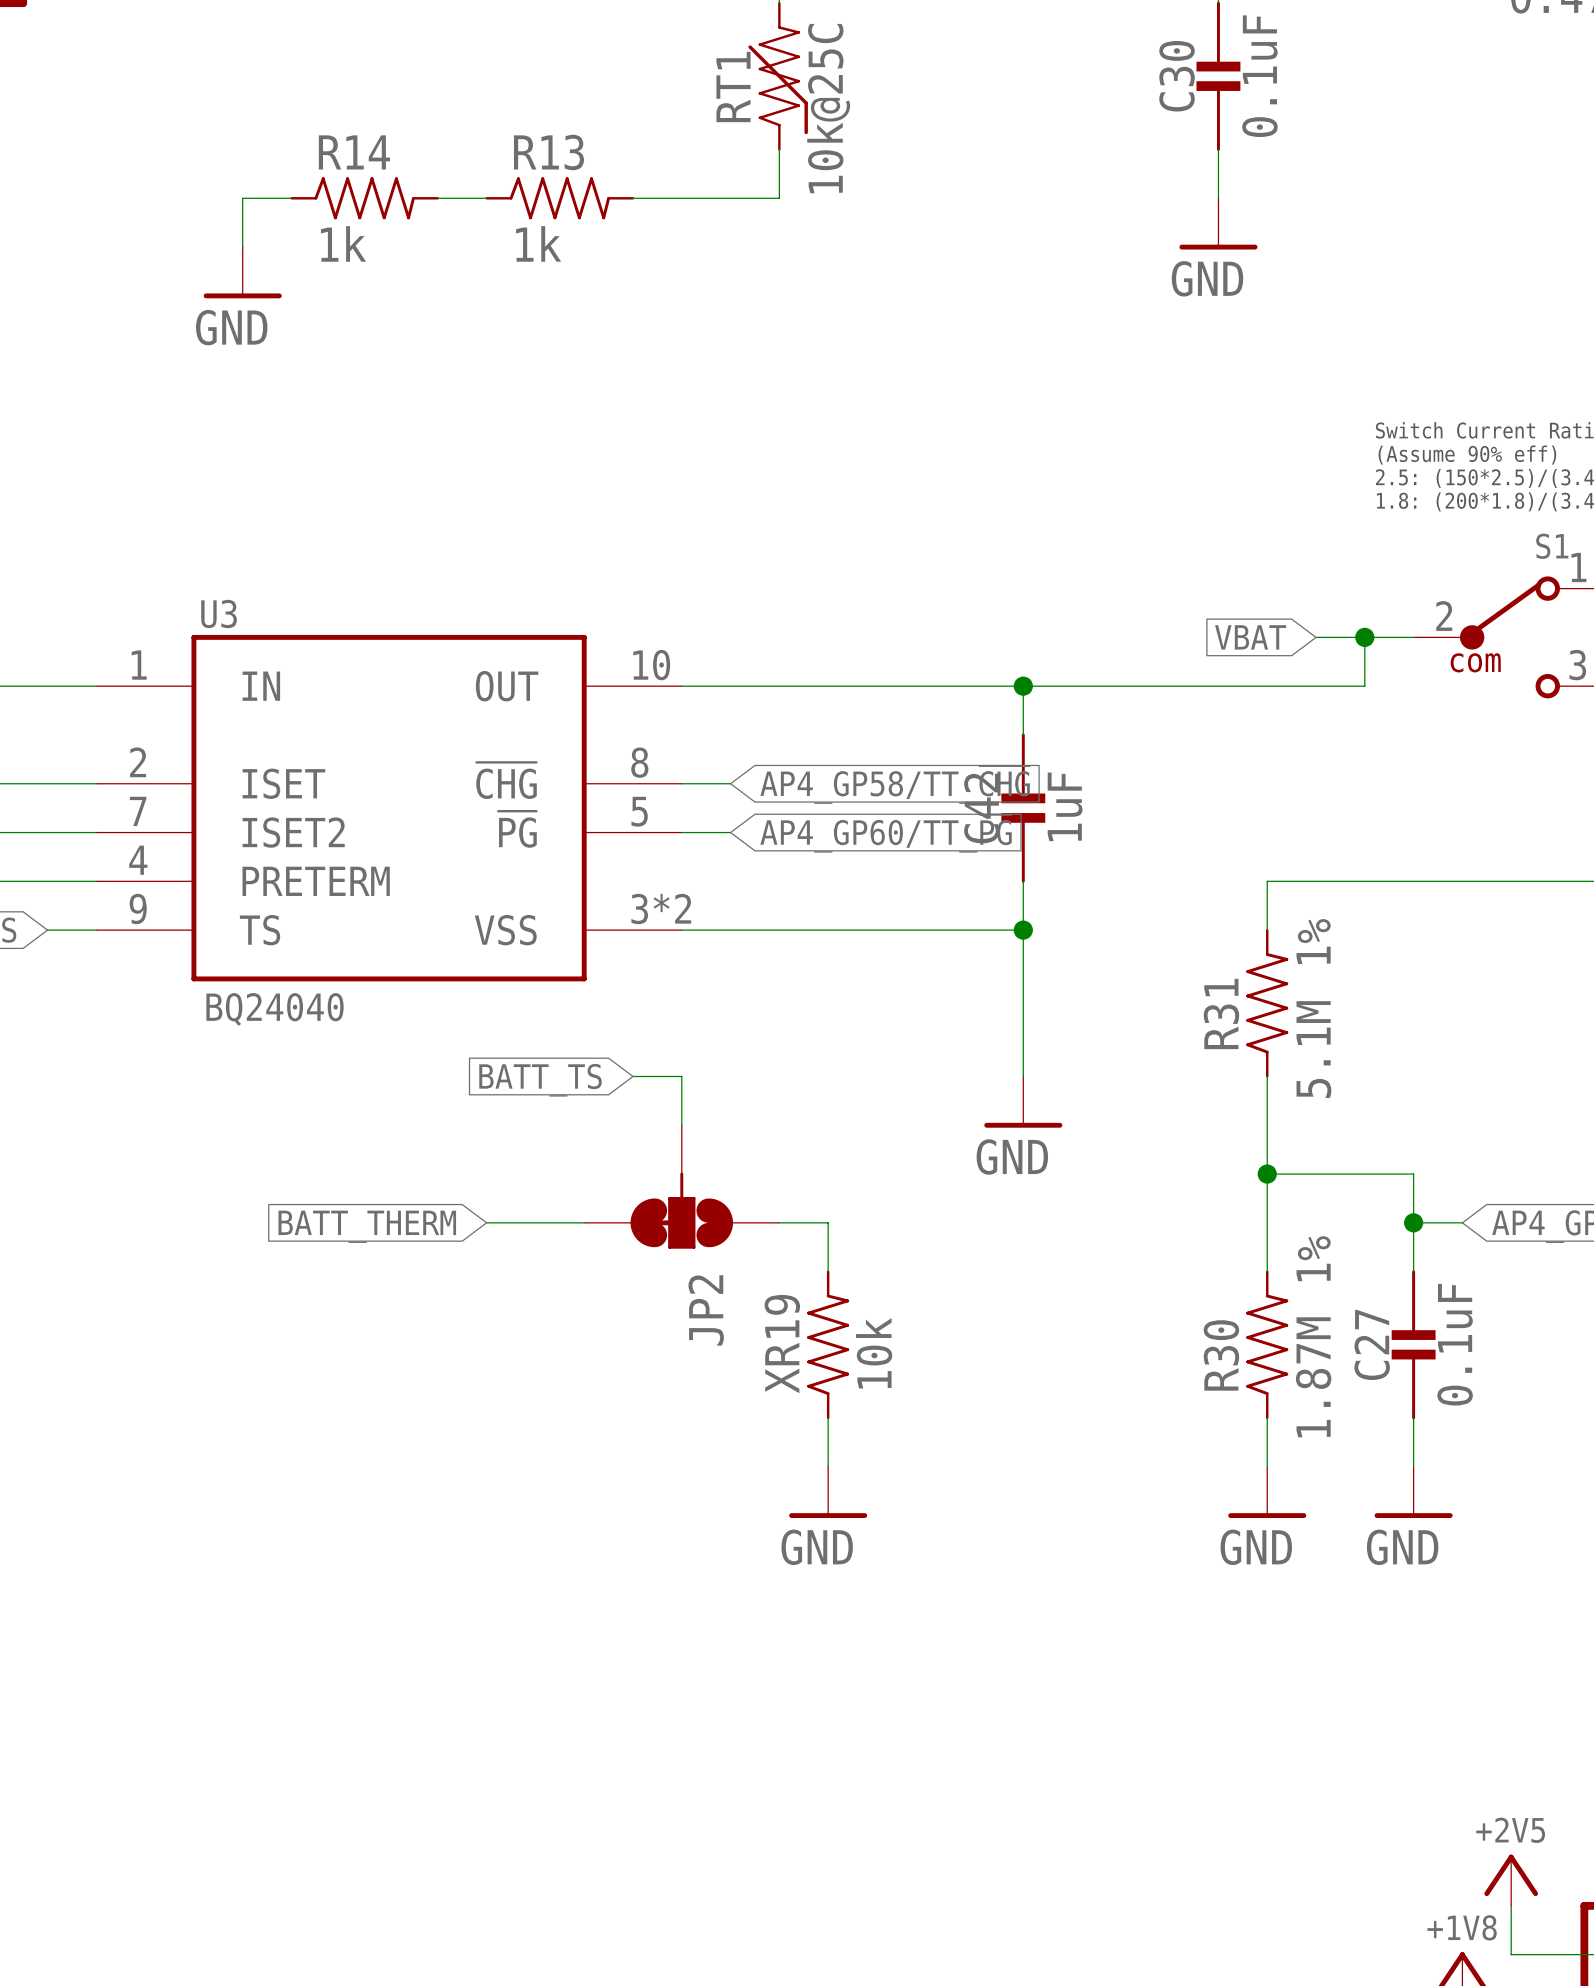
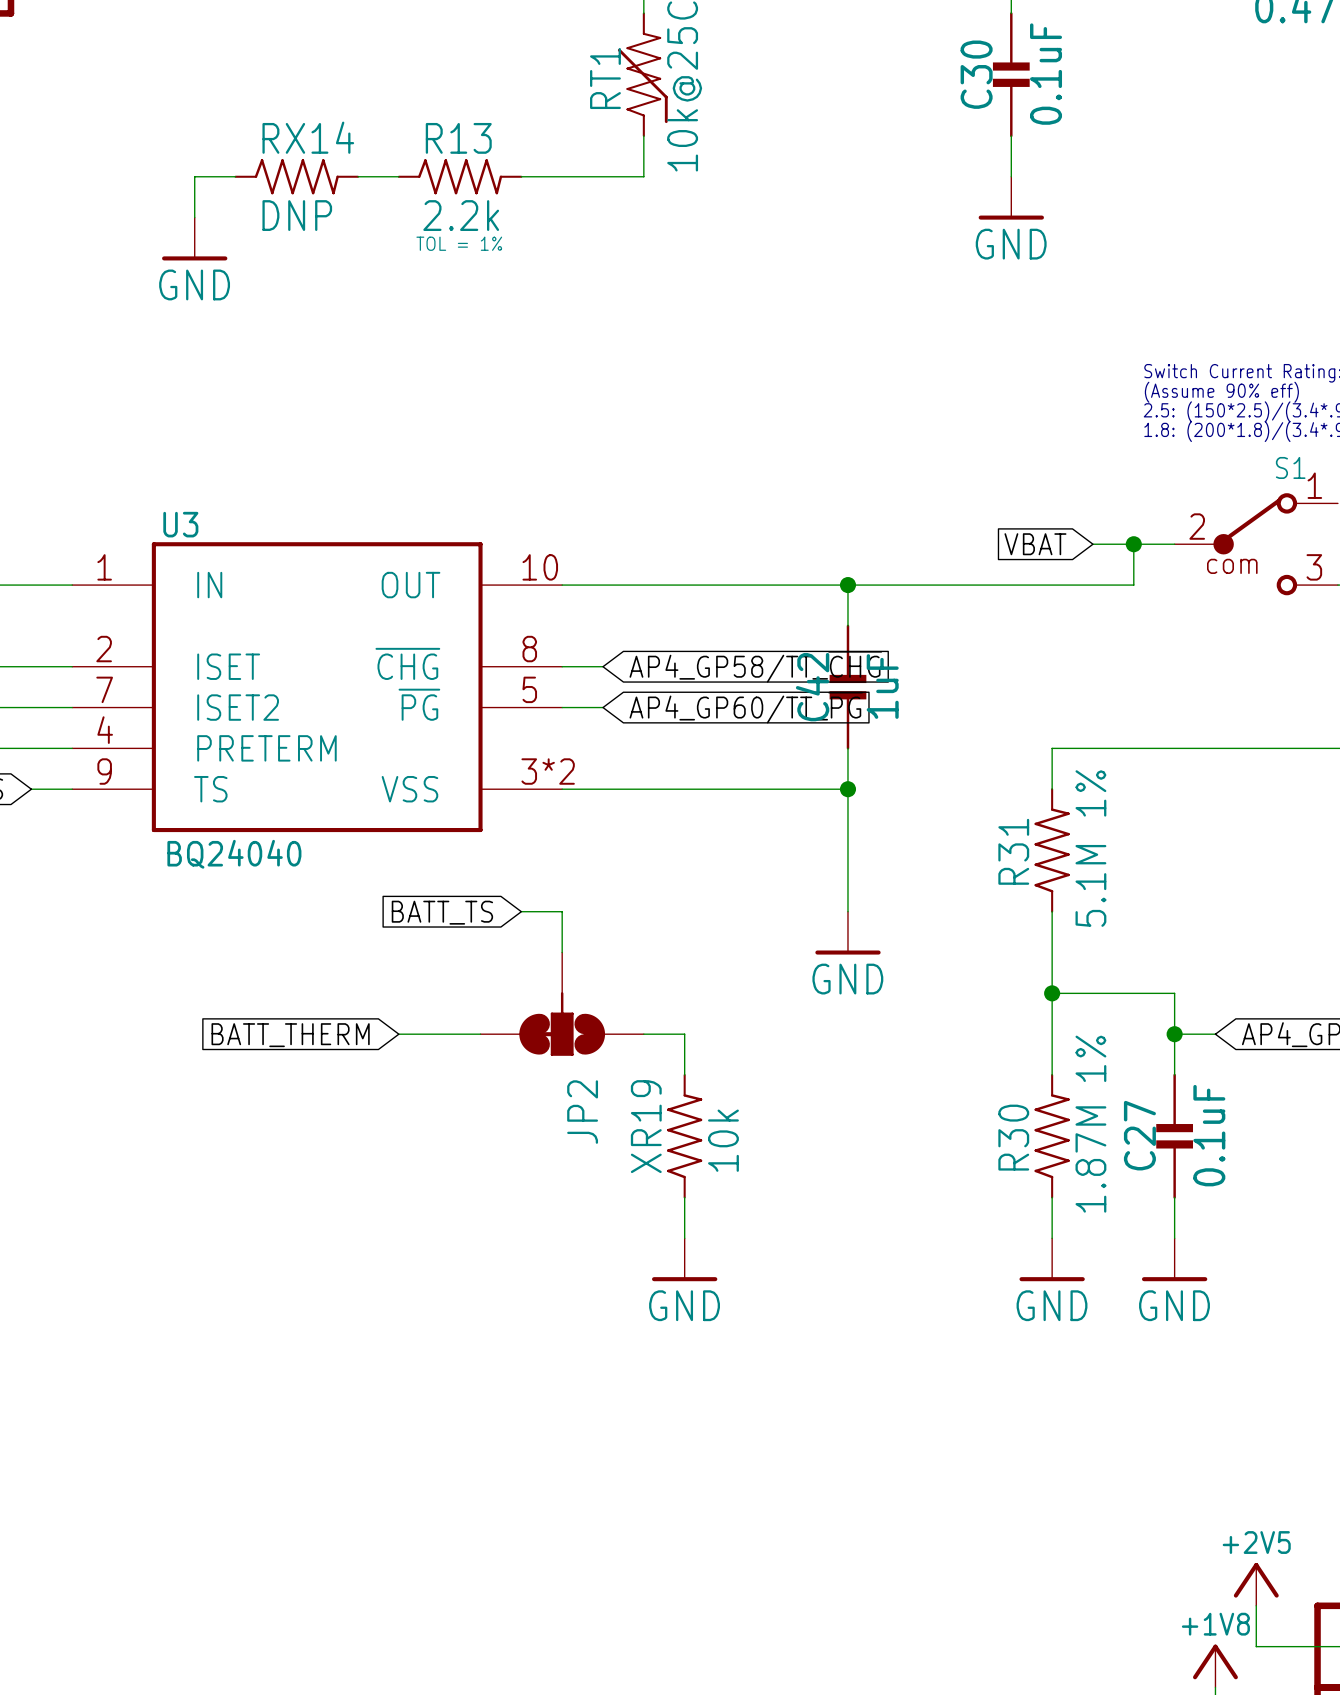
R14 name: R14 (354, 152) -> RX14 (308, 137)
R14 value: 1k (343, 243) -> DNP (297, 215)
R13 value: 1k (538, 243) -> 2.2k (461, 215)
R13 text: none -> TOL = 1% (459, 243)

